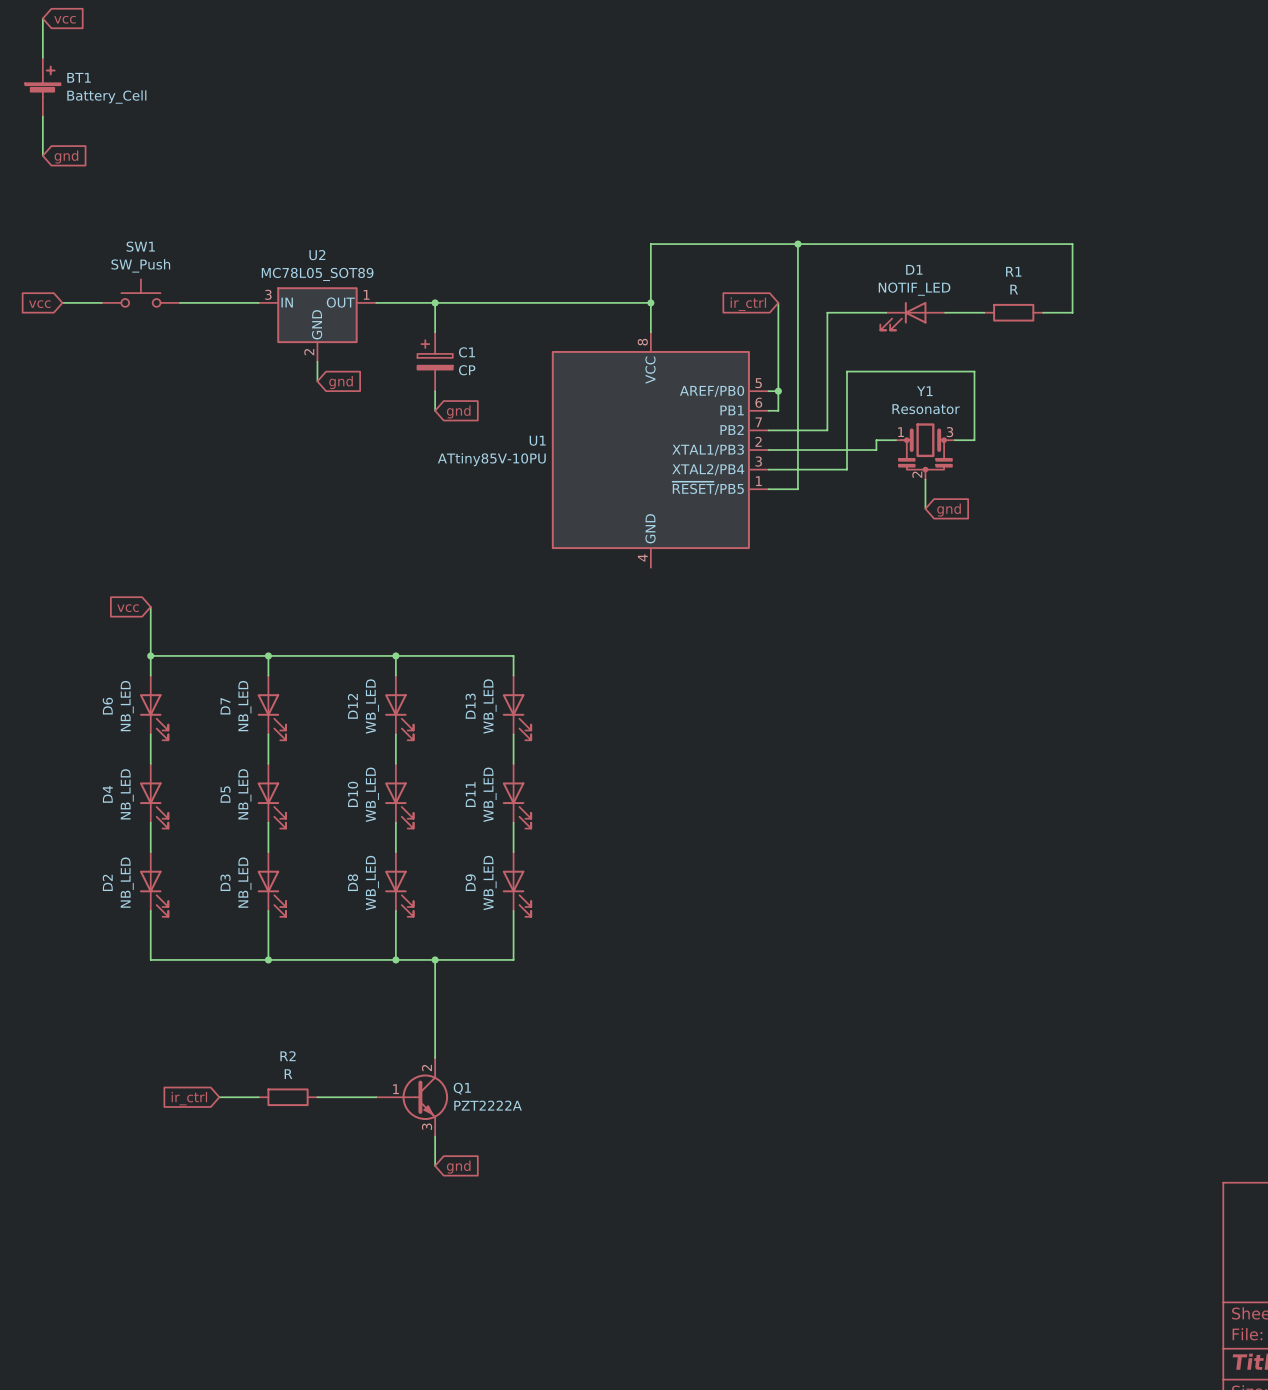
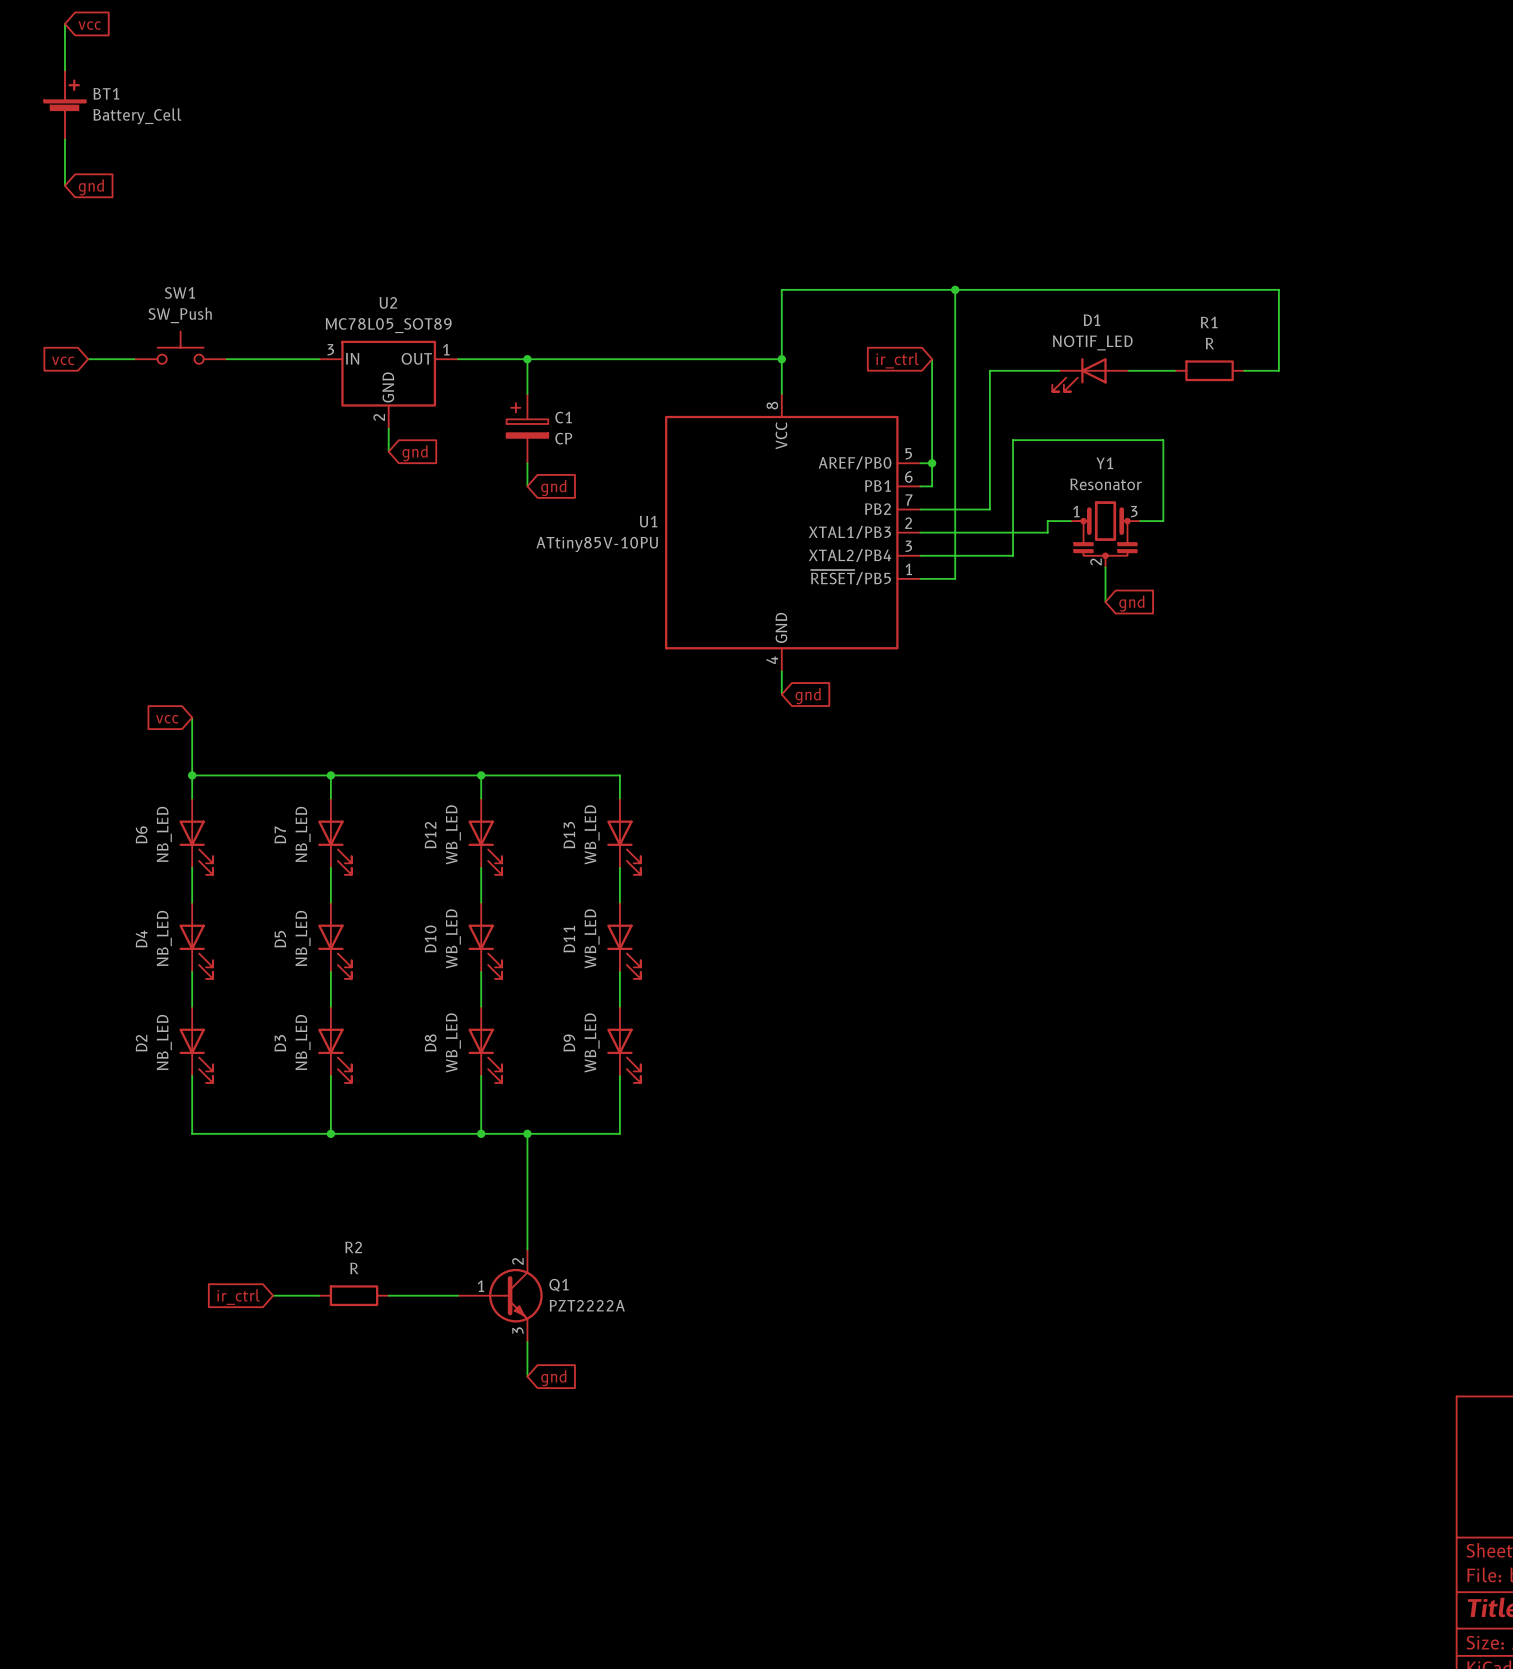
wire: none -> (781, 671) (781, 694)
global label: none -> gnd (808, 696)

